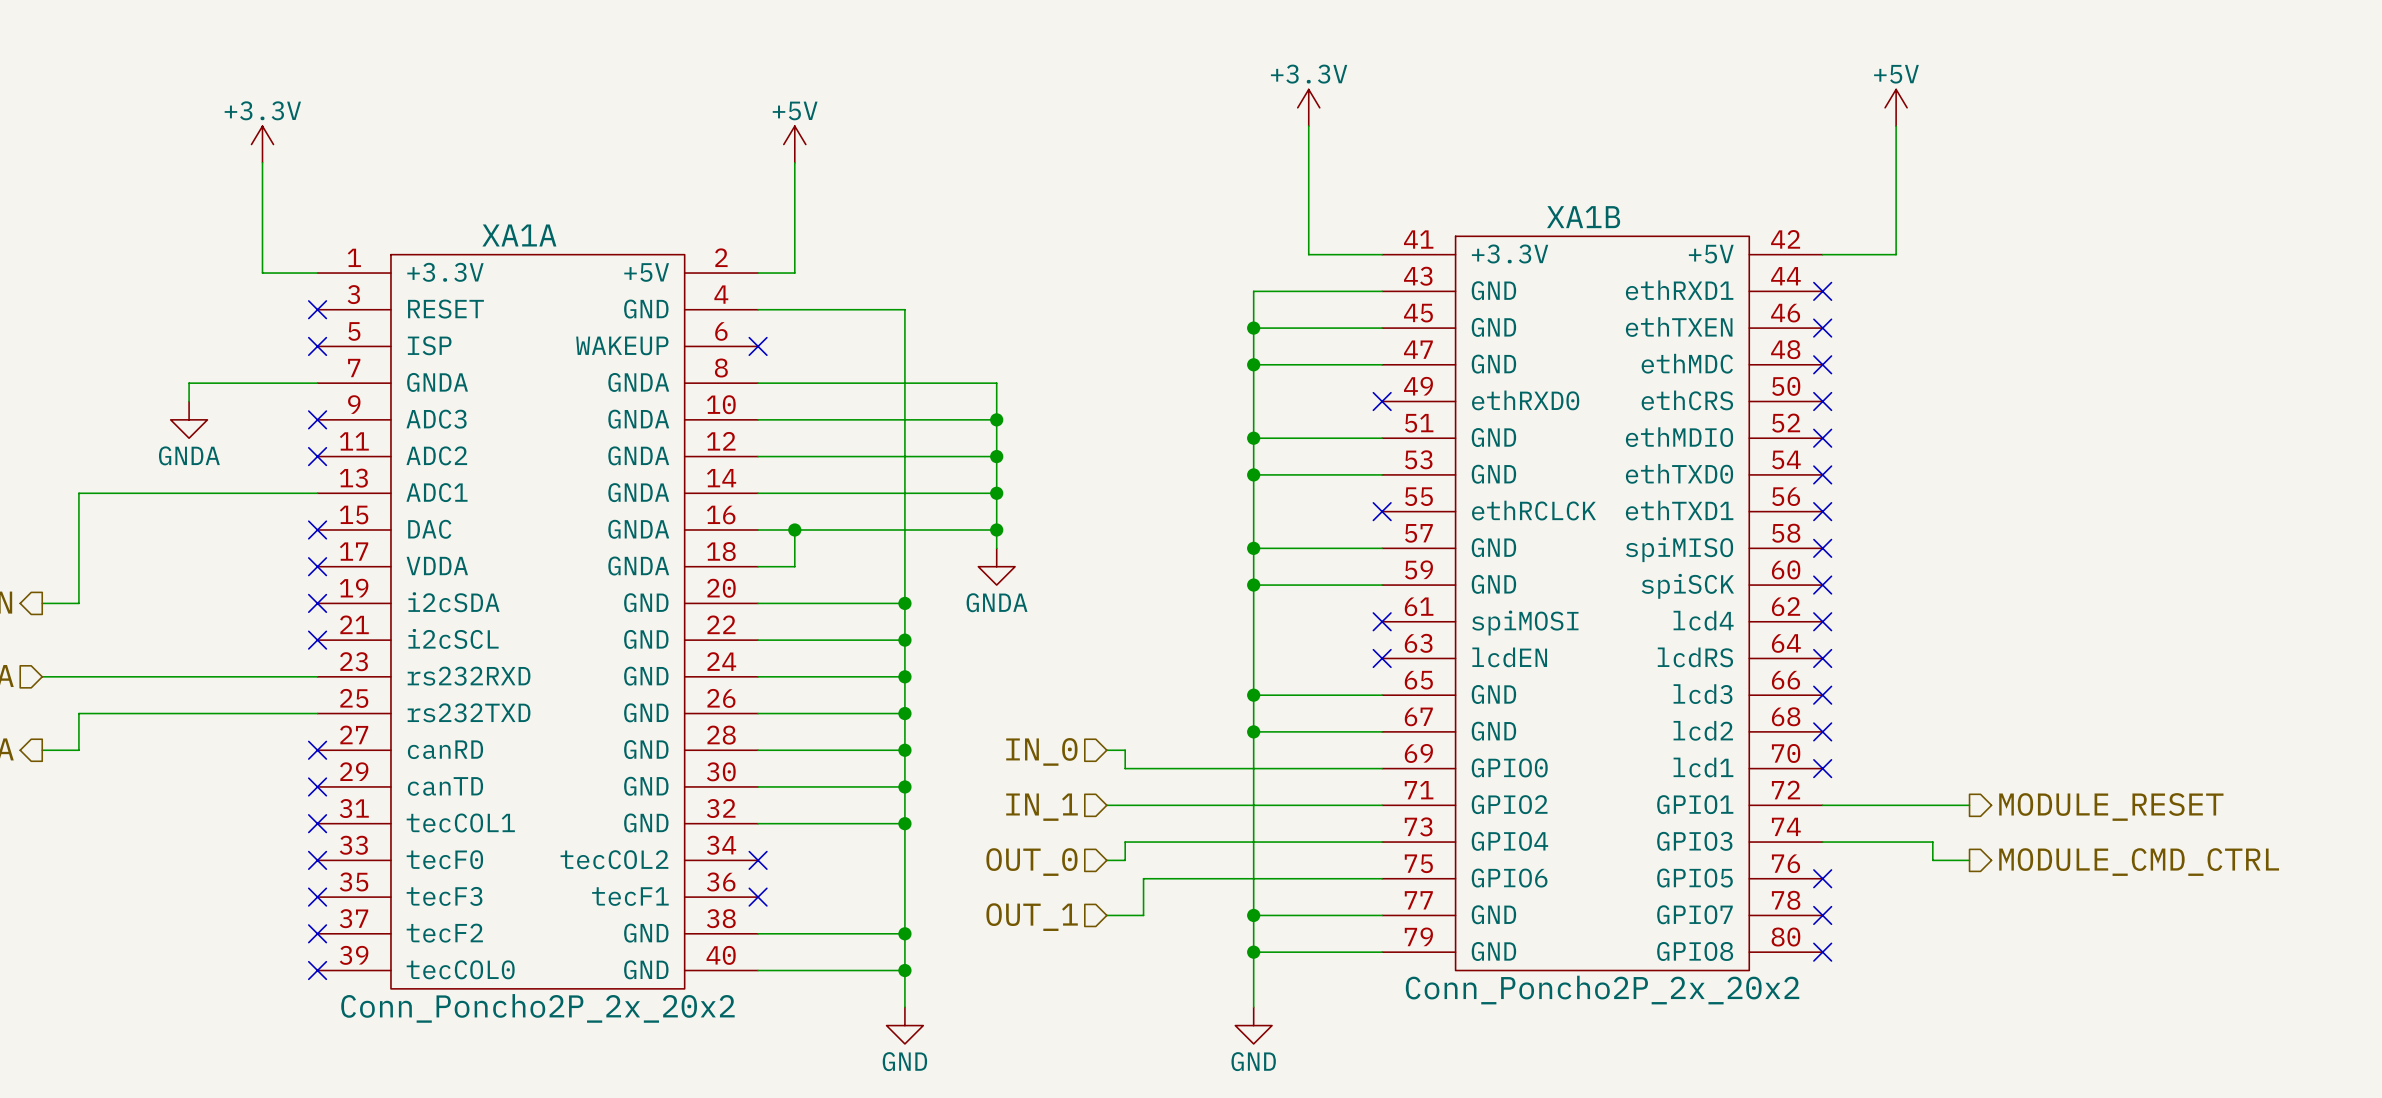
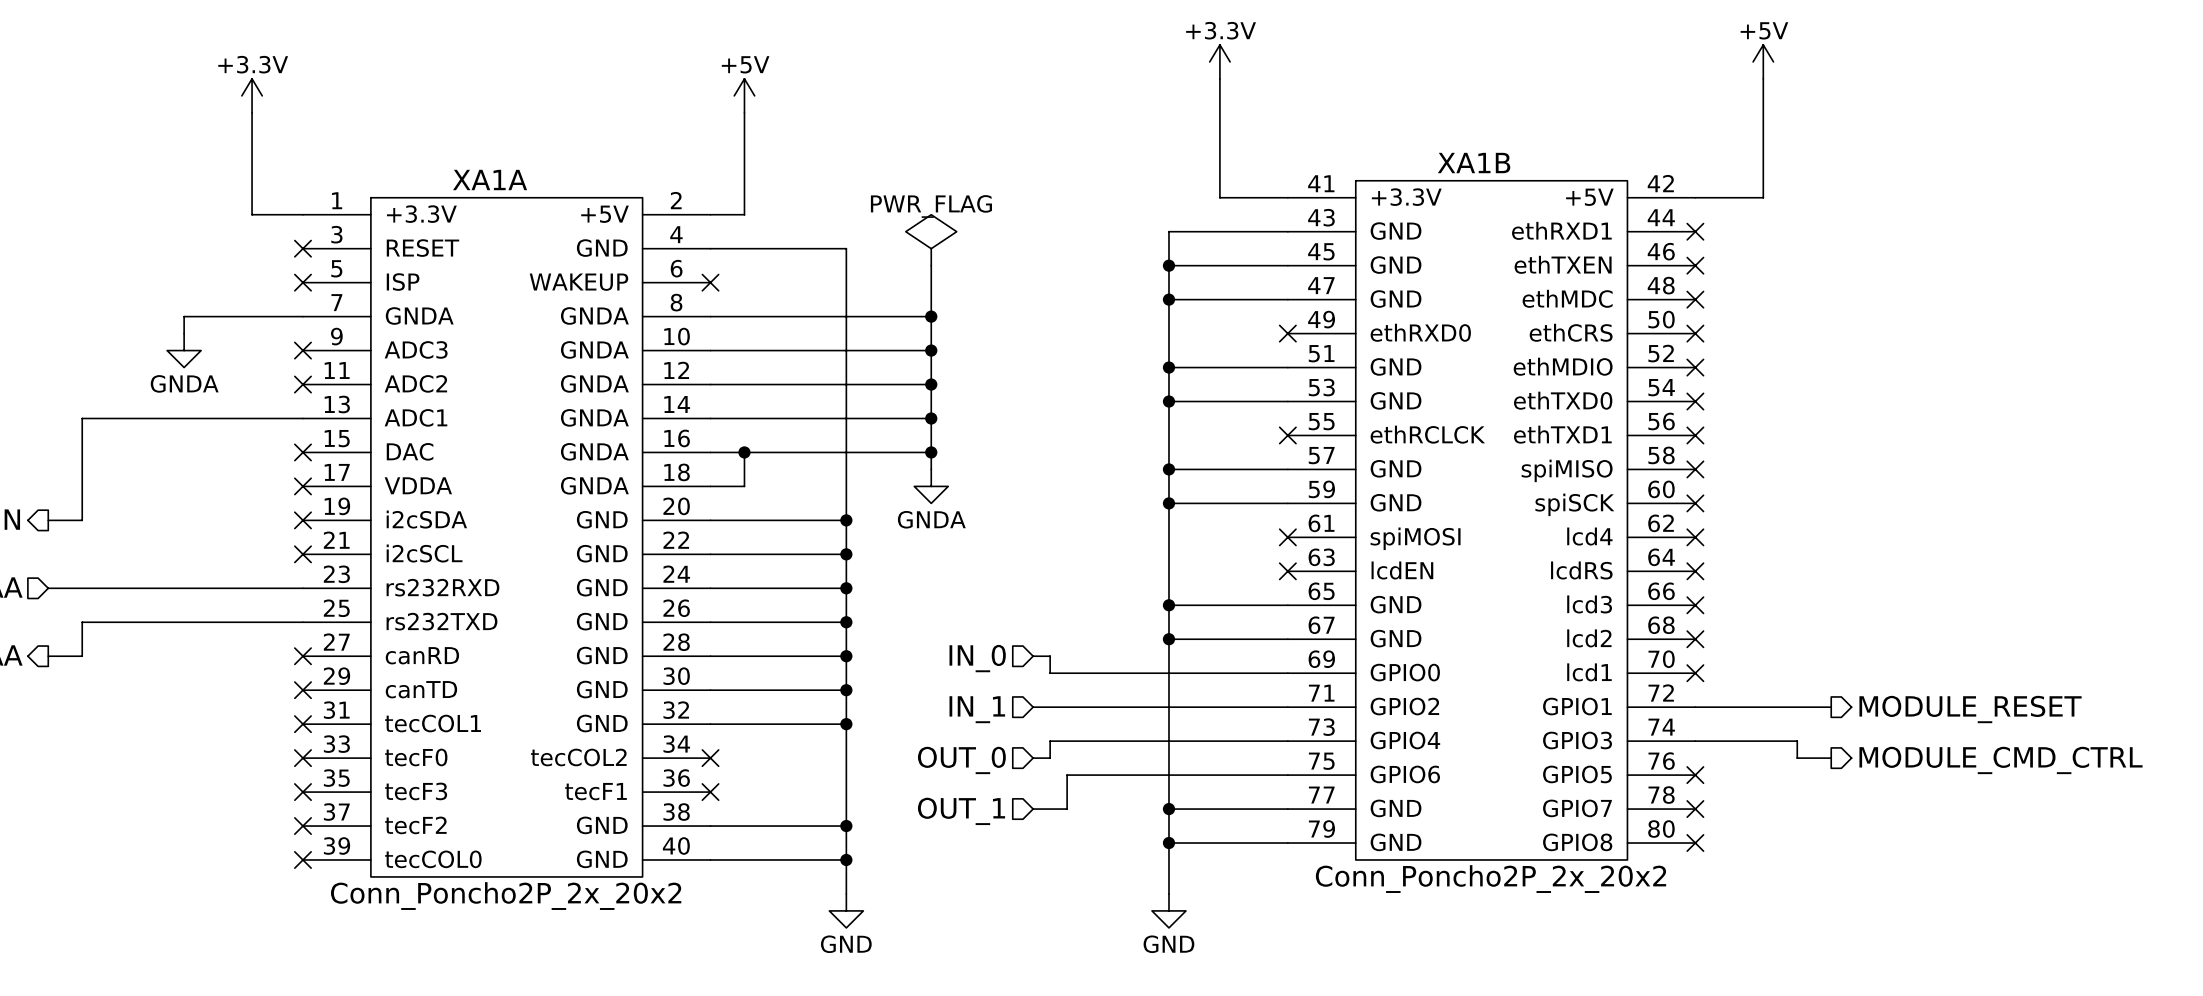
power symbol: none -> PWR_FLAG (931, 240)
wire: none -> (931, 265) (931, 316)
junction: none -> (931, 316)

